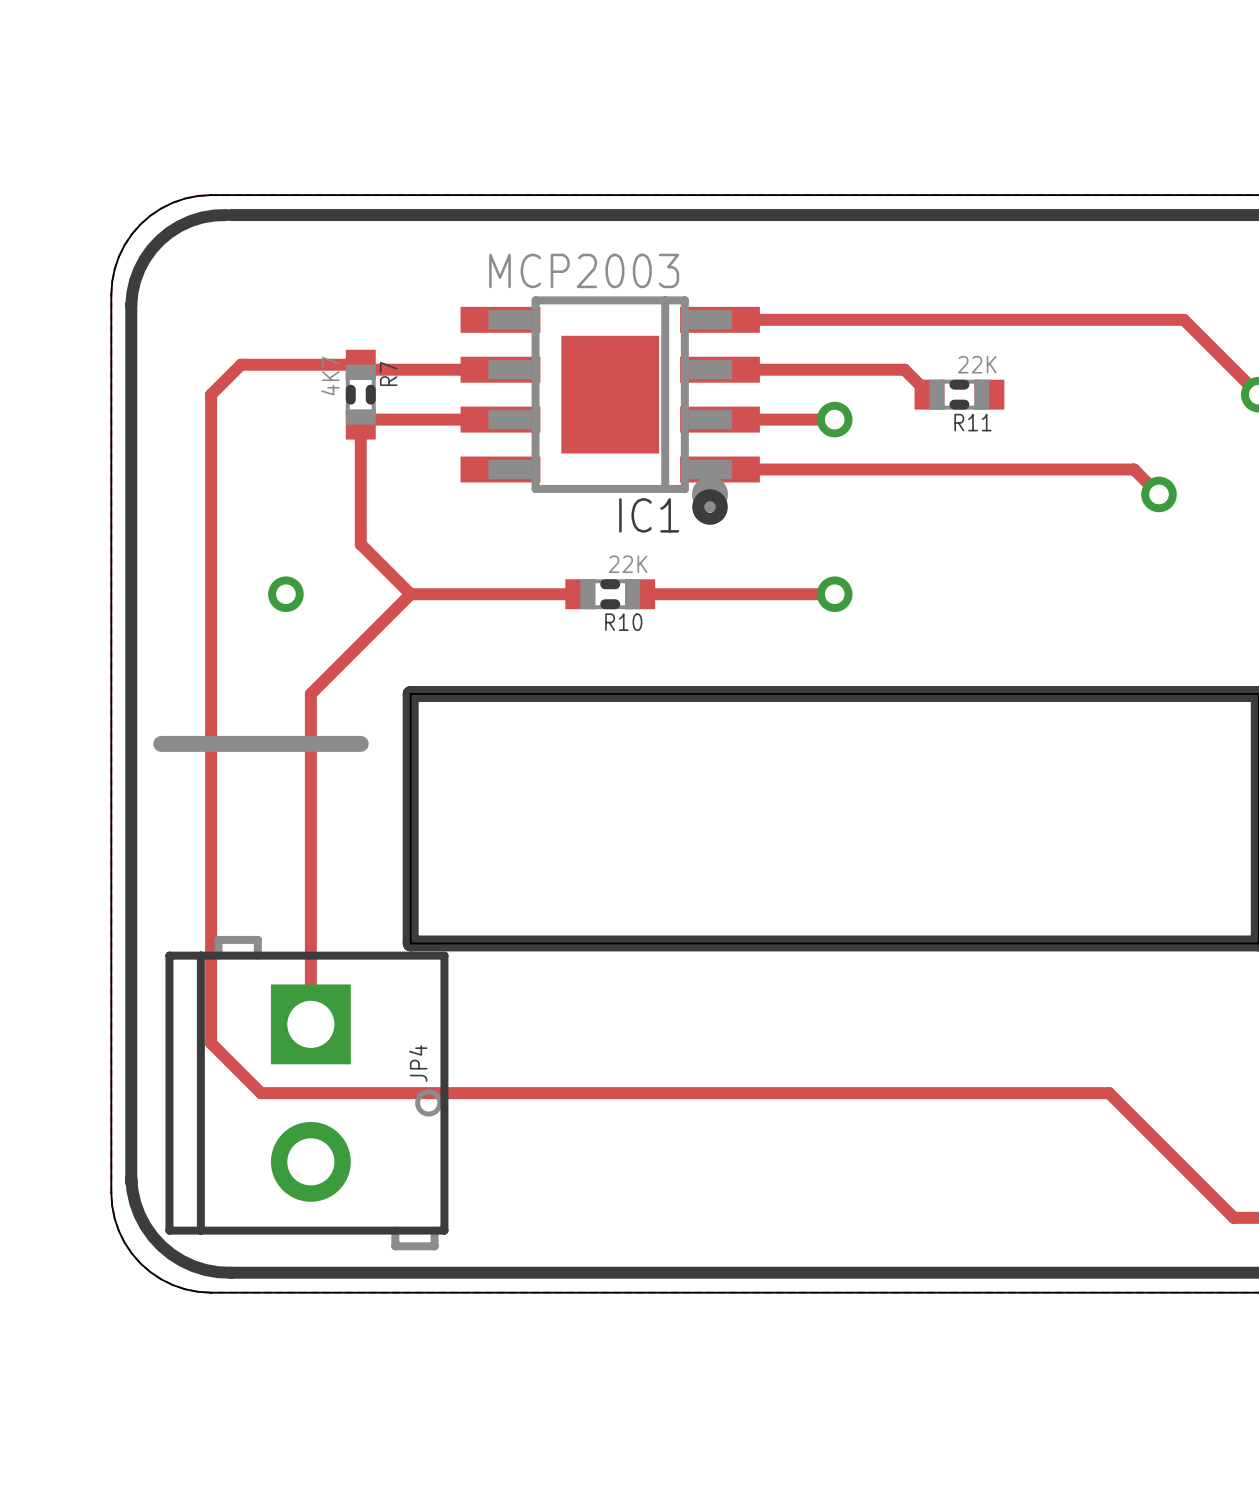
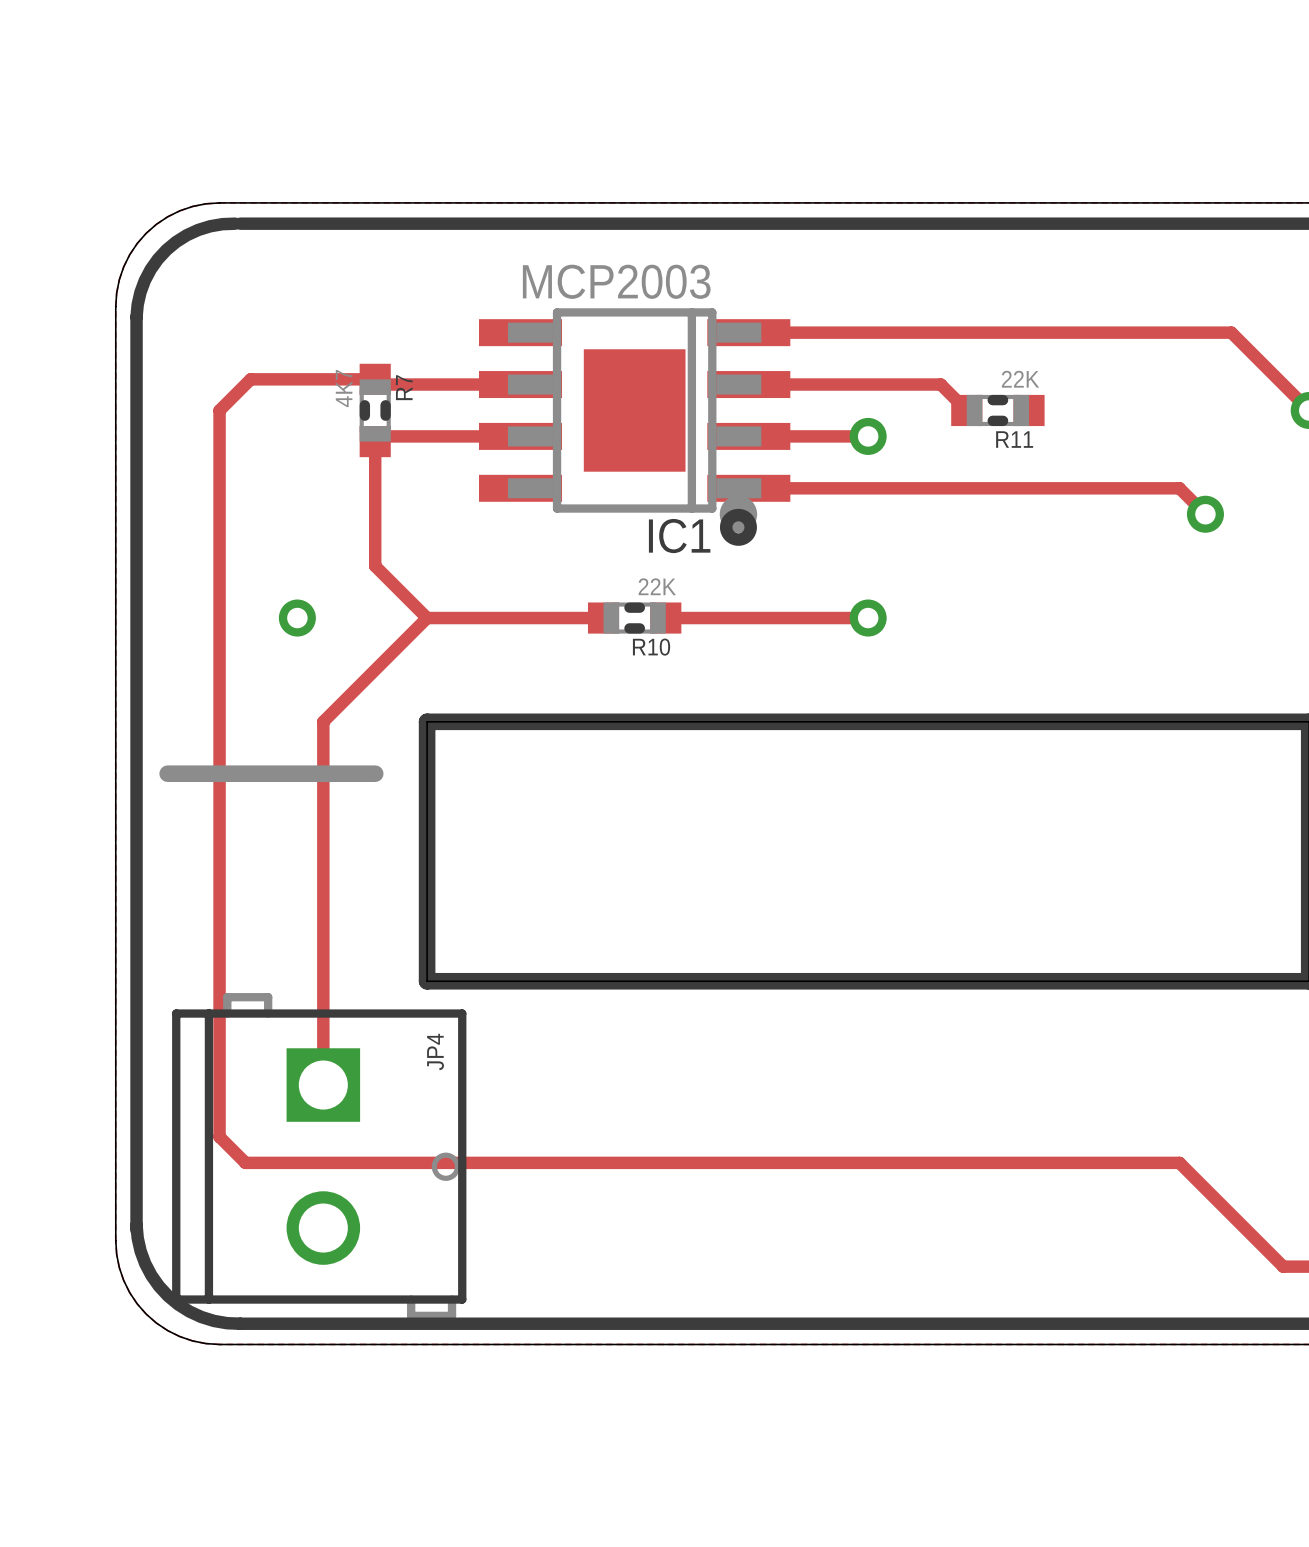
JP4 footprint: [165, 935, 449, 1251] -> [172, 993, 467, 1321]
track: (211, 1043) (260, 1093) (1109, 1093) (1134, 1118) -> (219, 1085) (219, 1136) (245, 1162) (1179, 1162)
JP4 name position: JP4 (418, 1063) -> JP4 (435, 1052)

